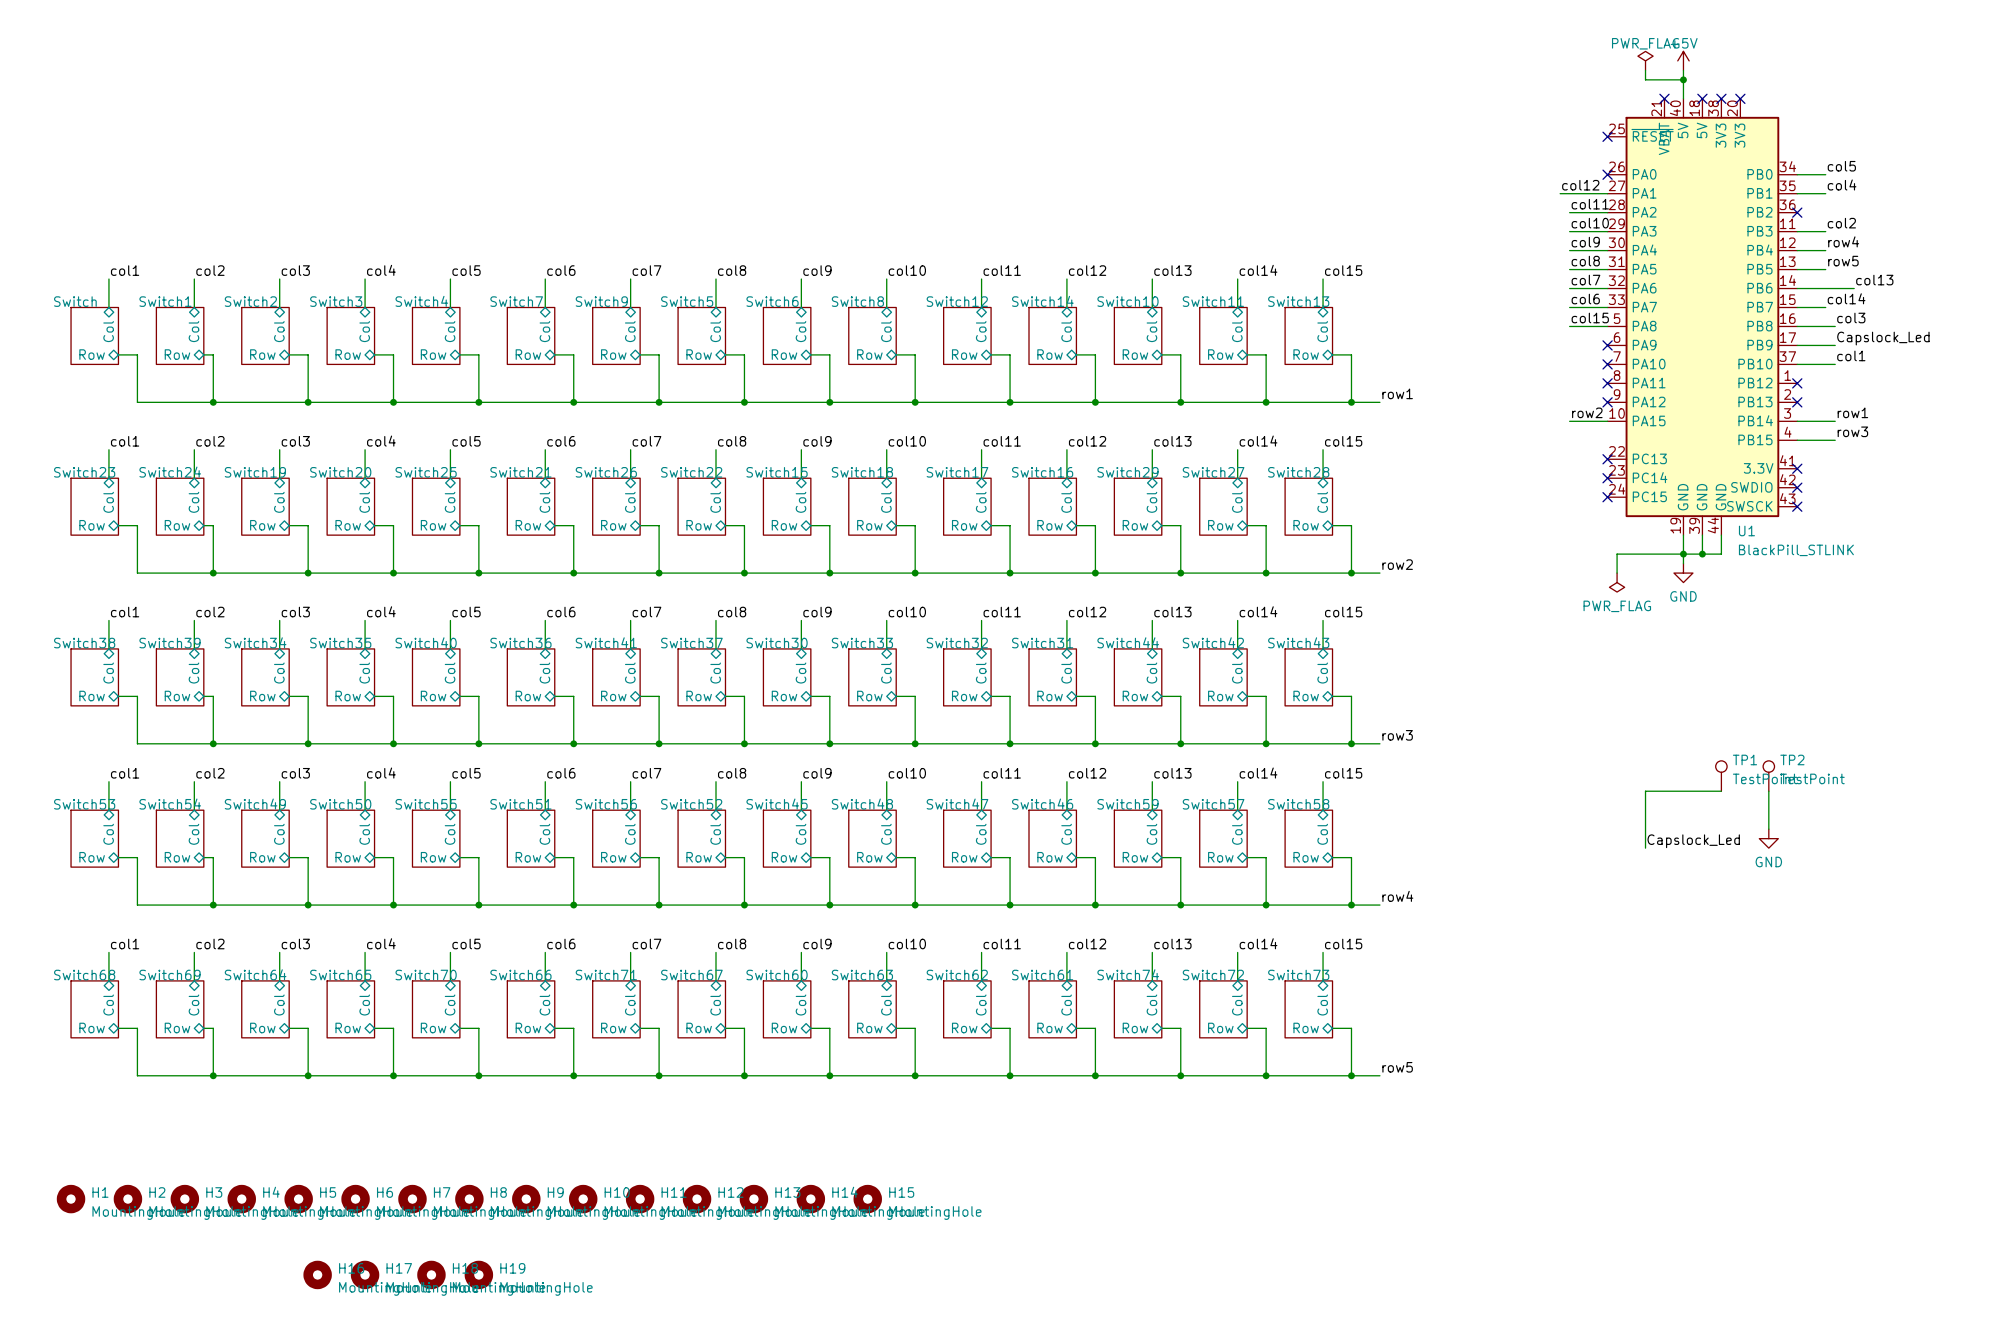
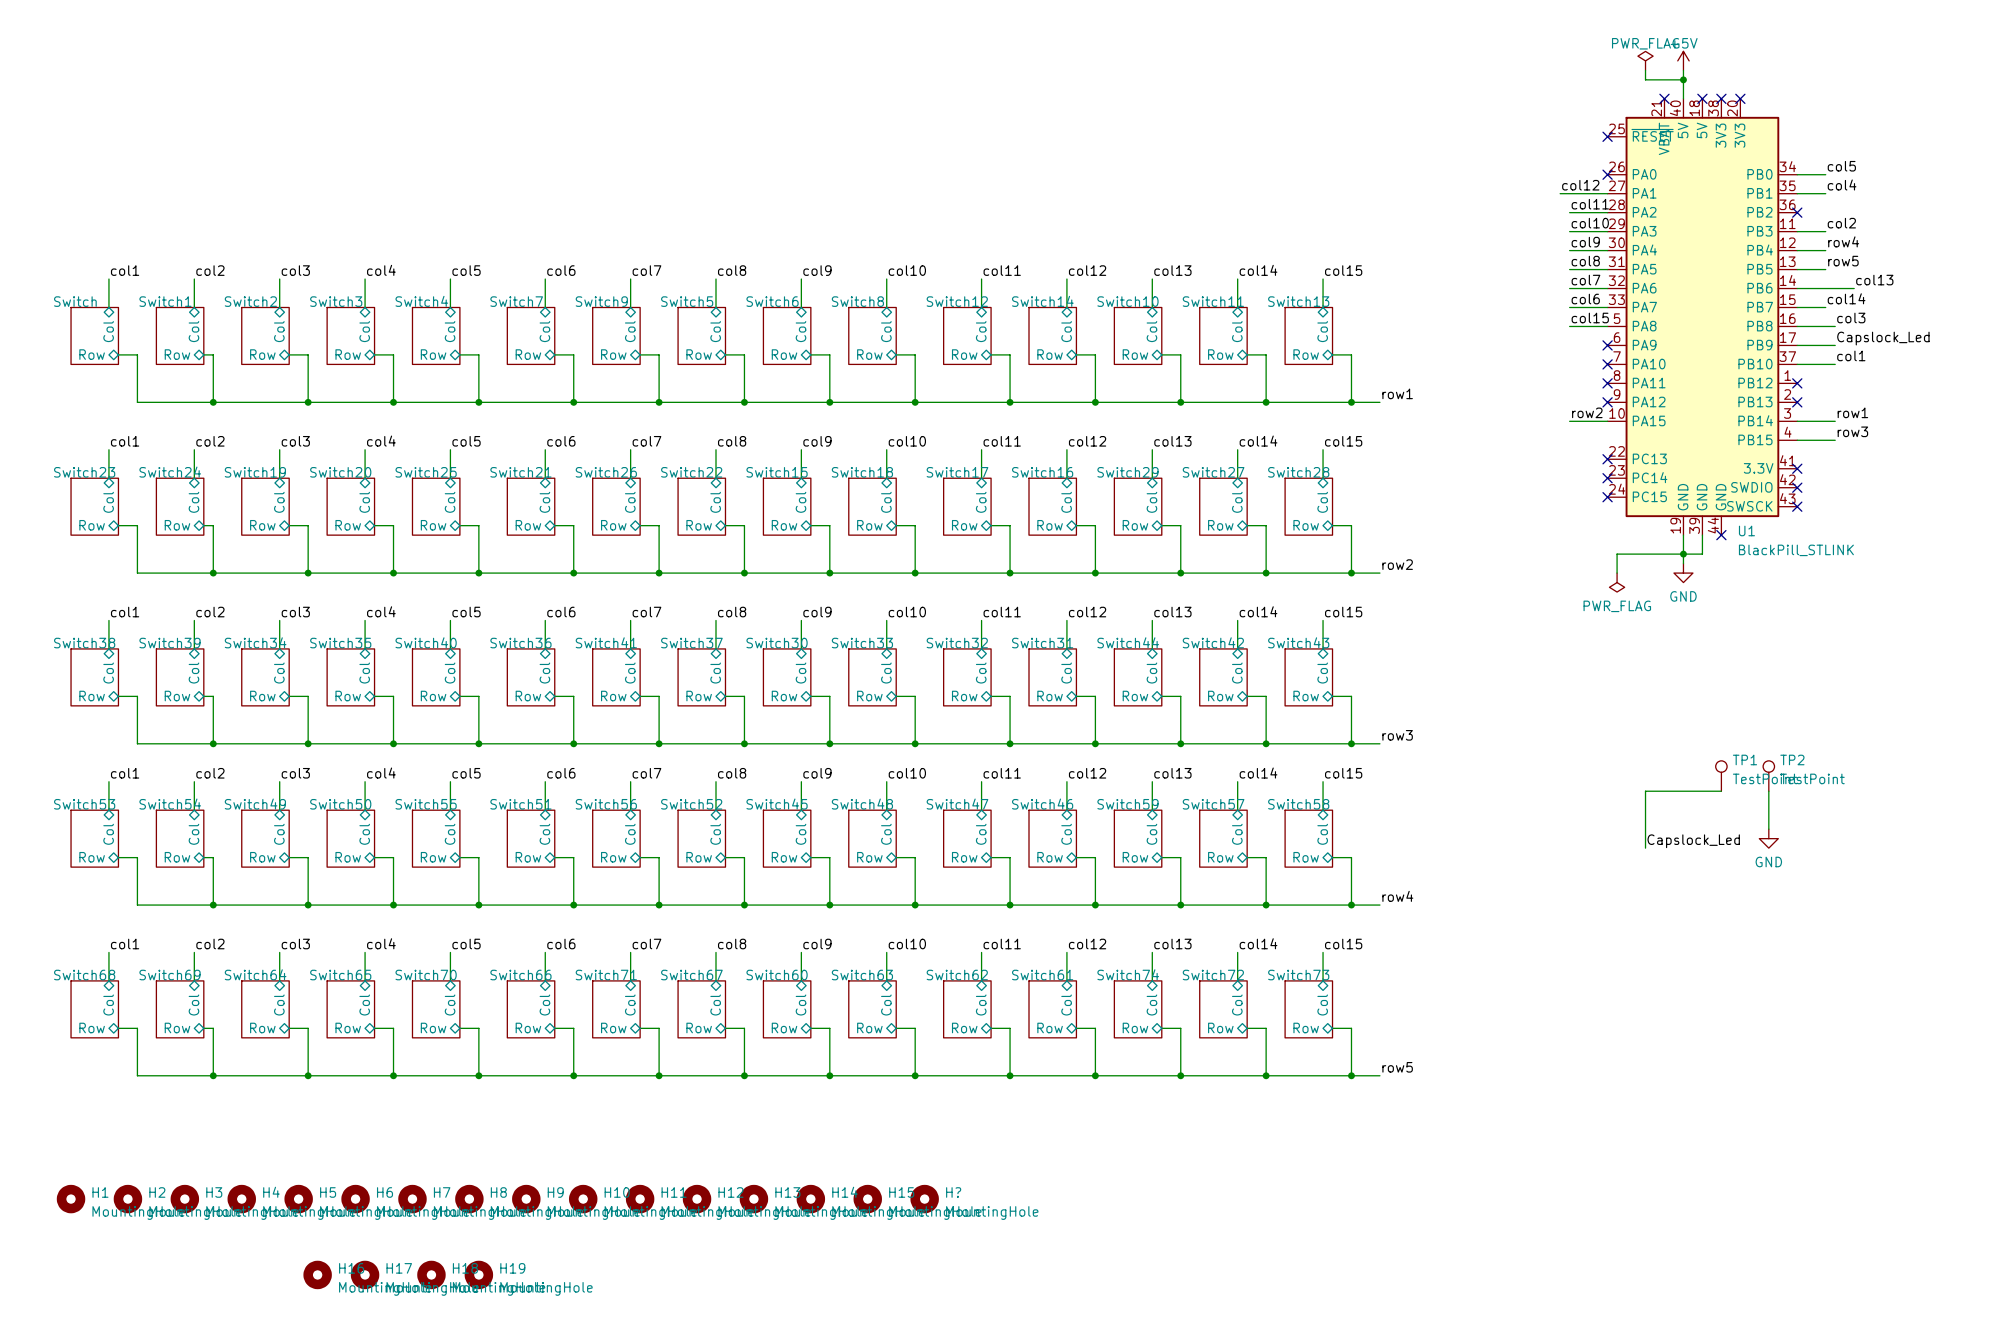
wire: (1721, 535) (1721, 554) (1702, 554) -> none
no-connect mark: none -> (1721, 535)
junction: (1702, 554) -> none
H?: none -> MountingHole (924, 1199)

